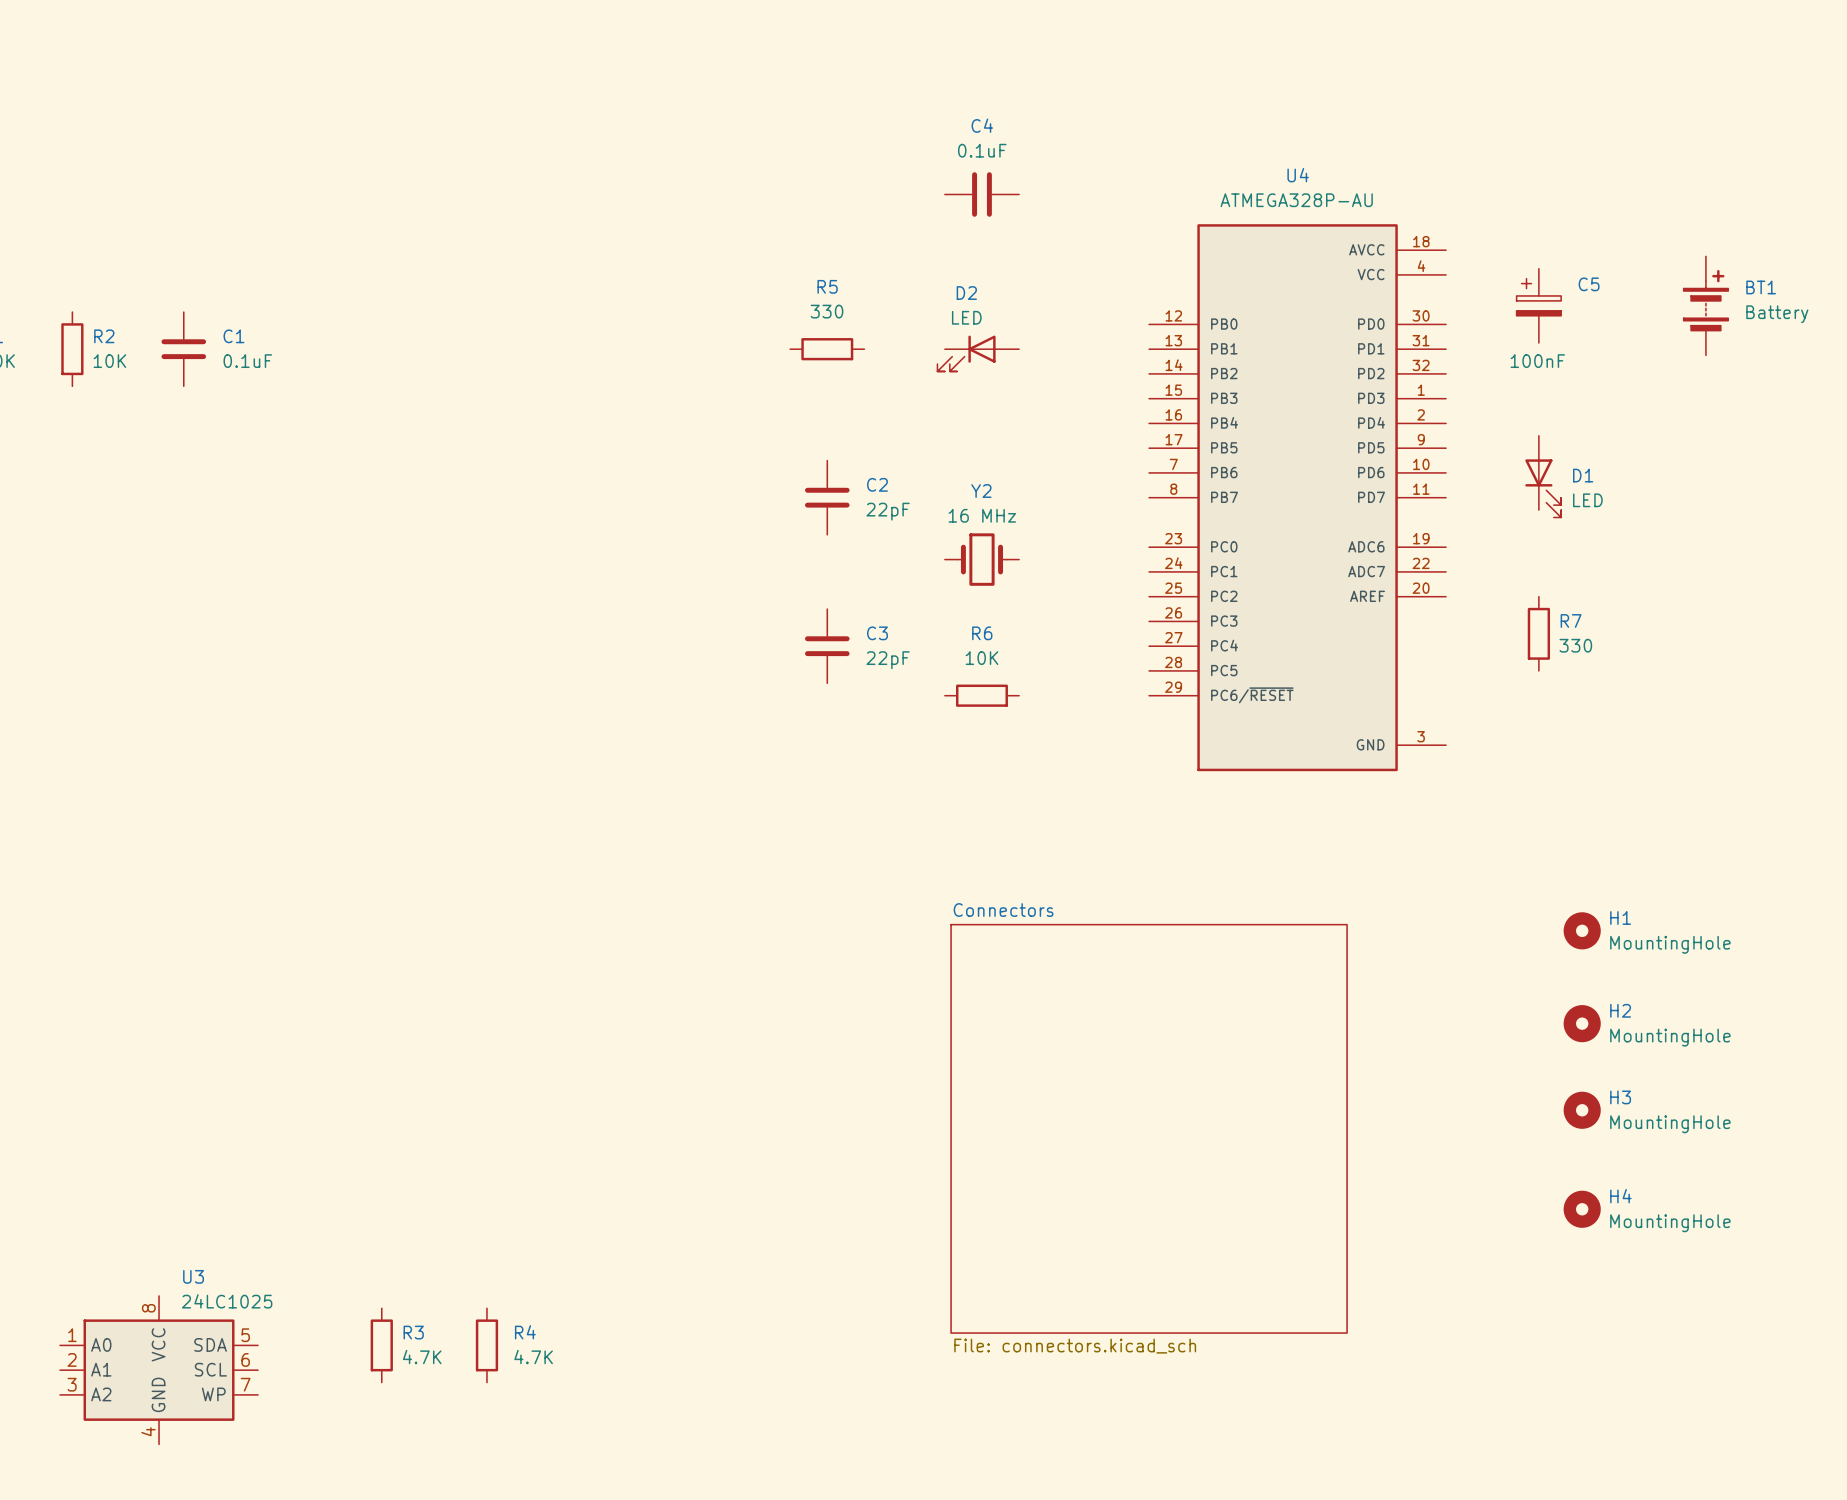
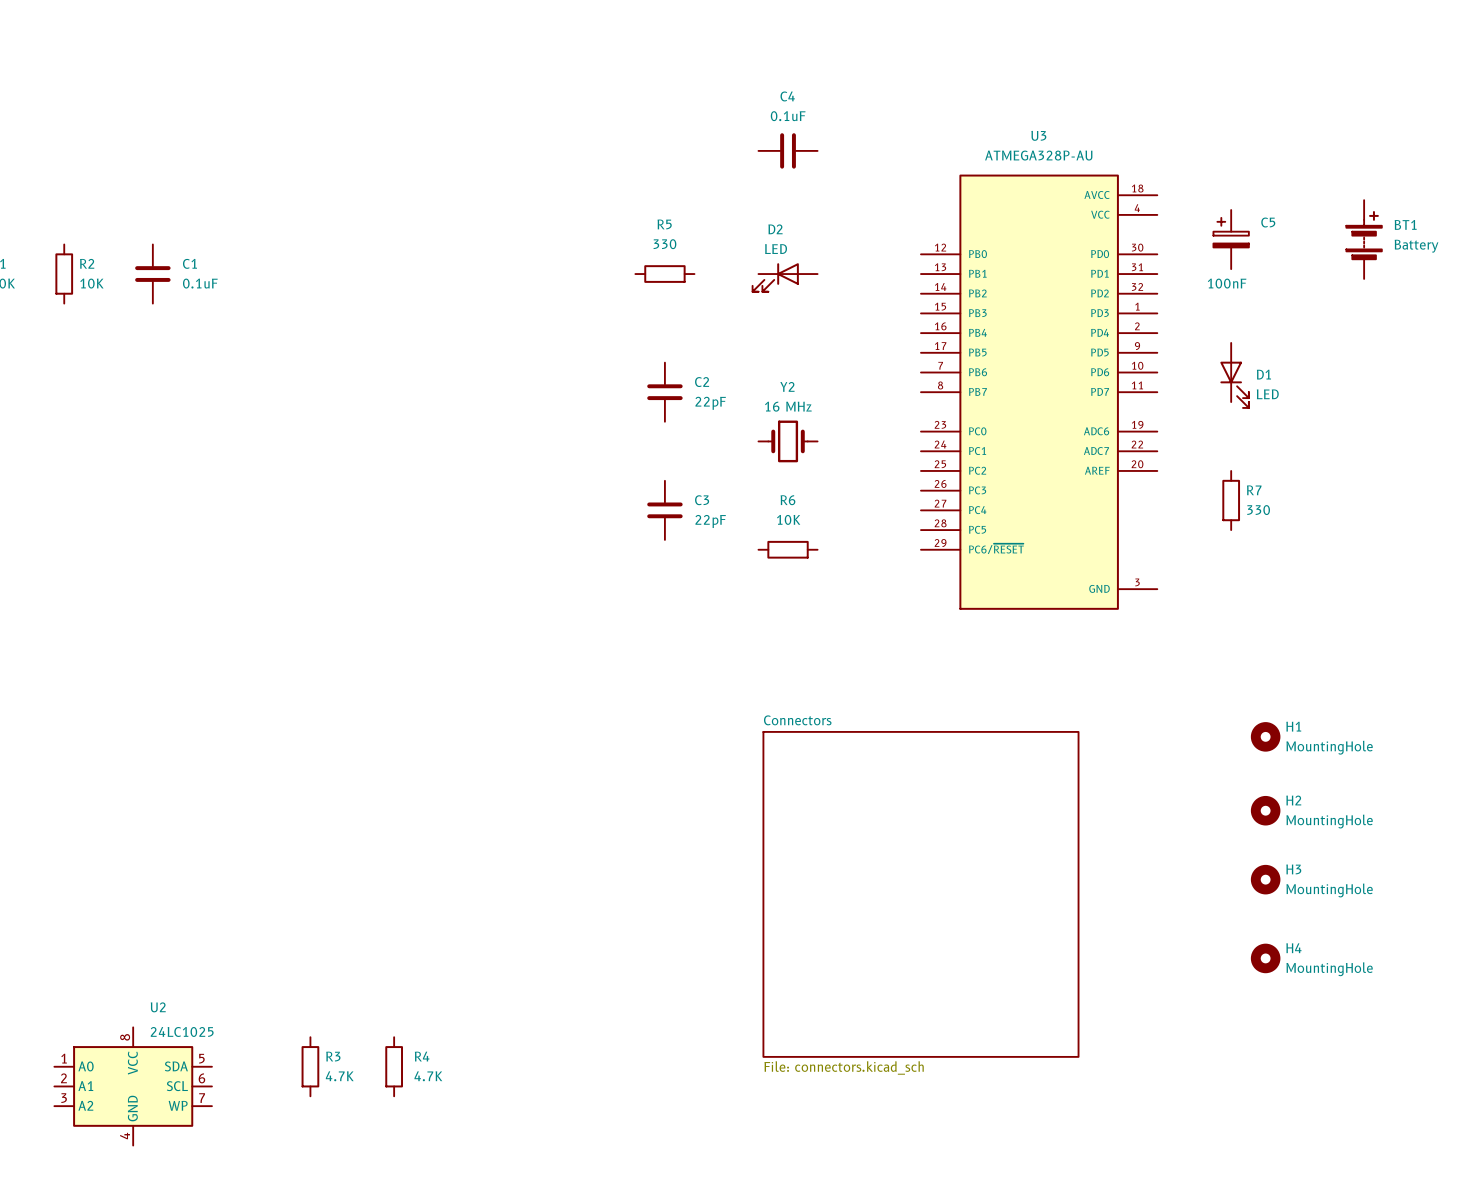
U4 name: U4 (1298, 175) -> U3 (1038, 135)
U3 name: U3 (193, 1276) -> U2 (158, 1007)

